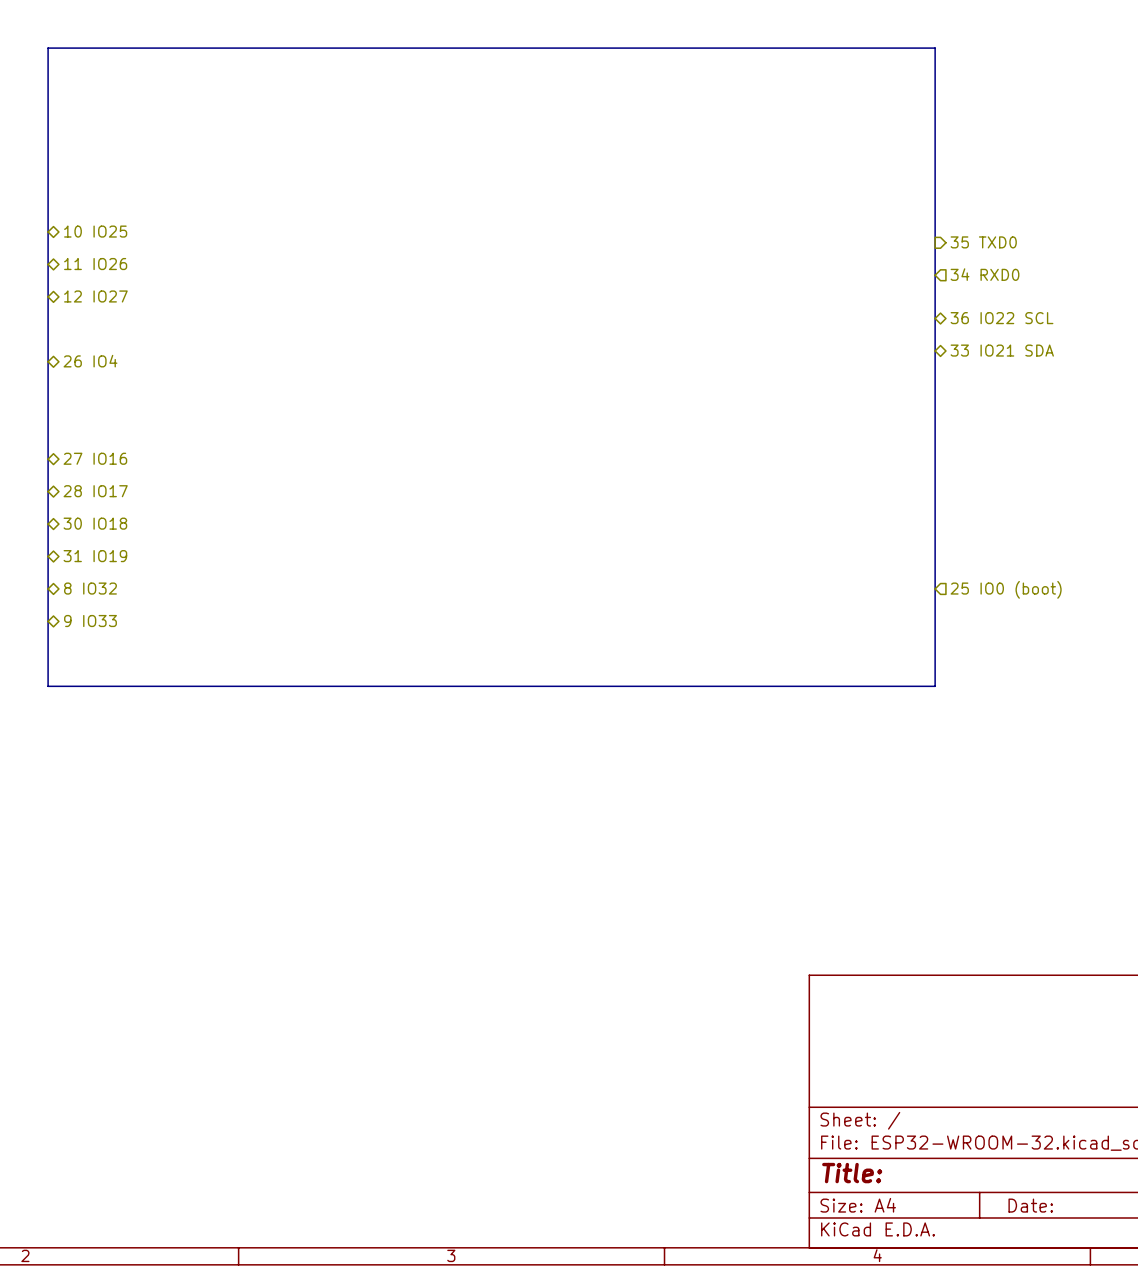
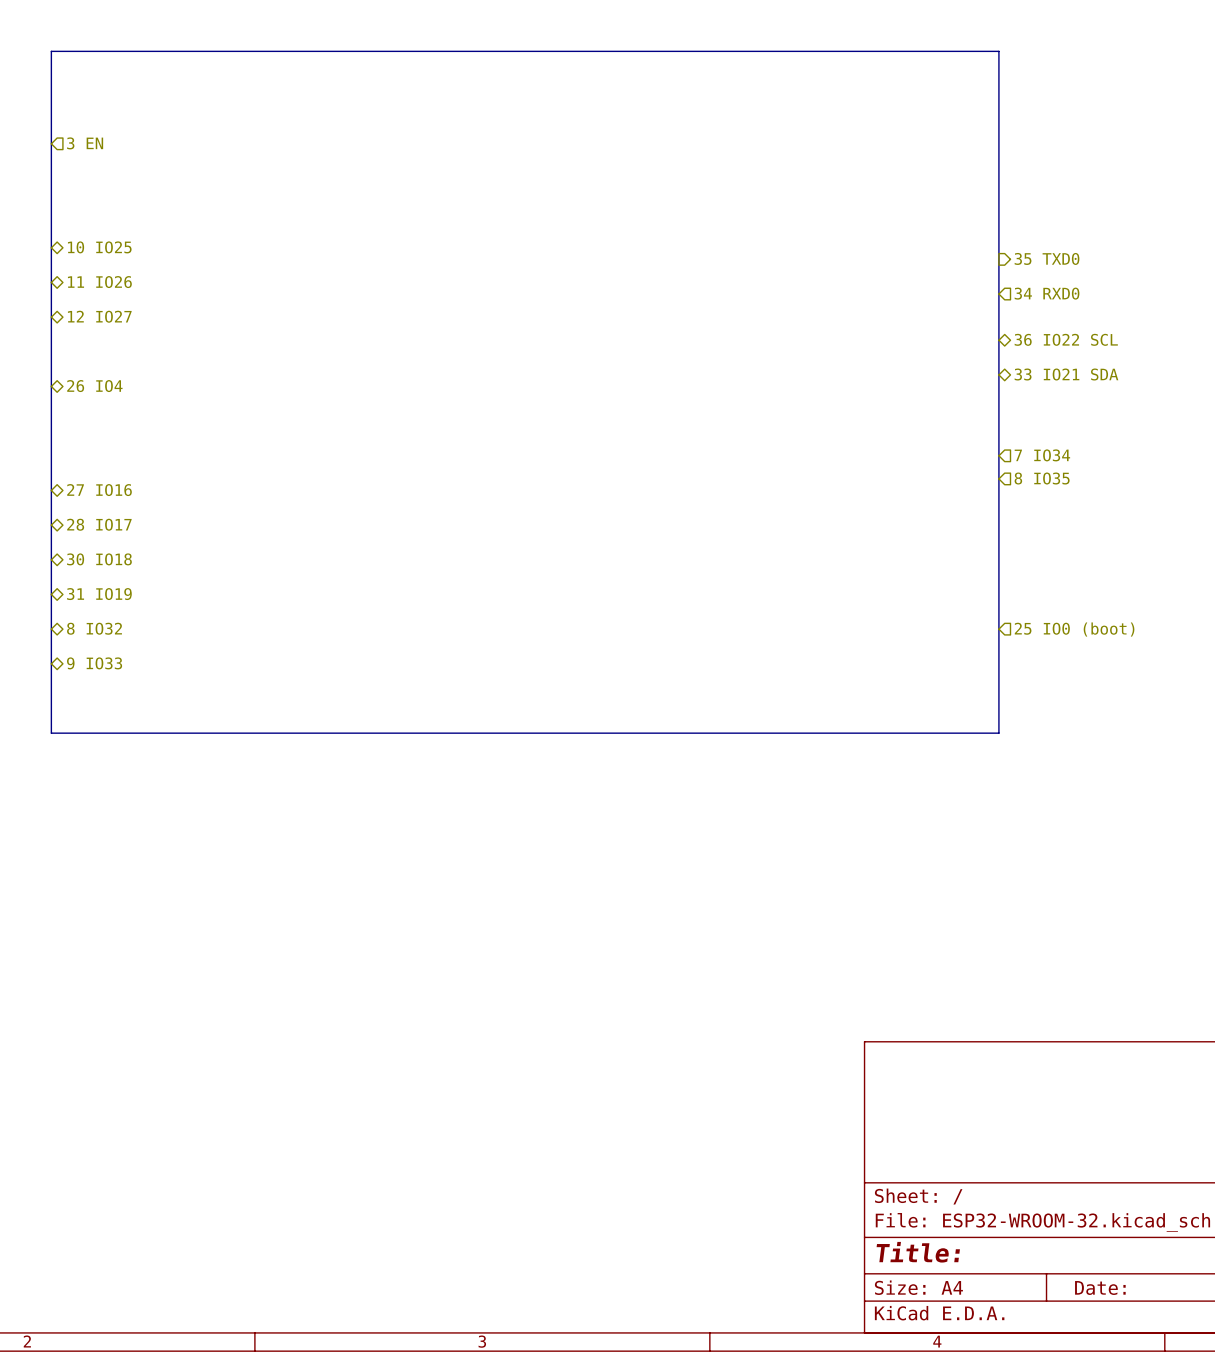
hierarchical label: none -> 3 EN (85, 143)
hierarchical label: none -> 7 IO34 (1042, 455)
hierarchical label: none -> 8 IO35 (1042, 478)

